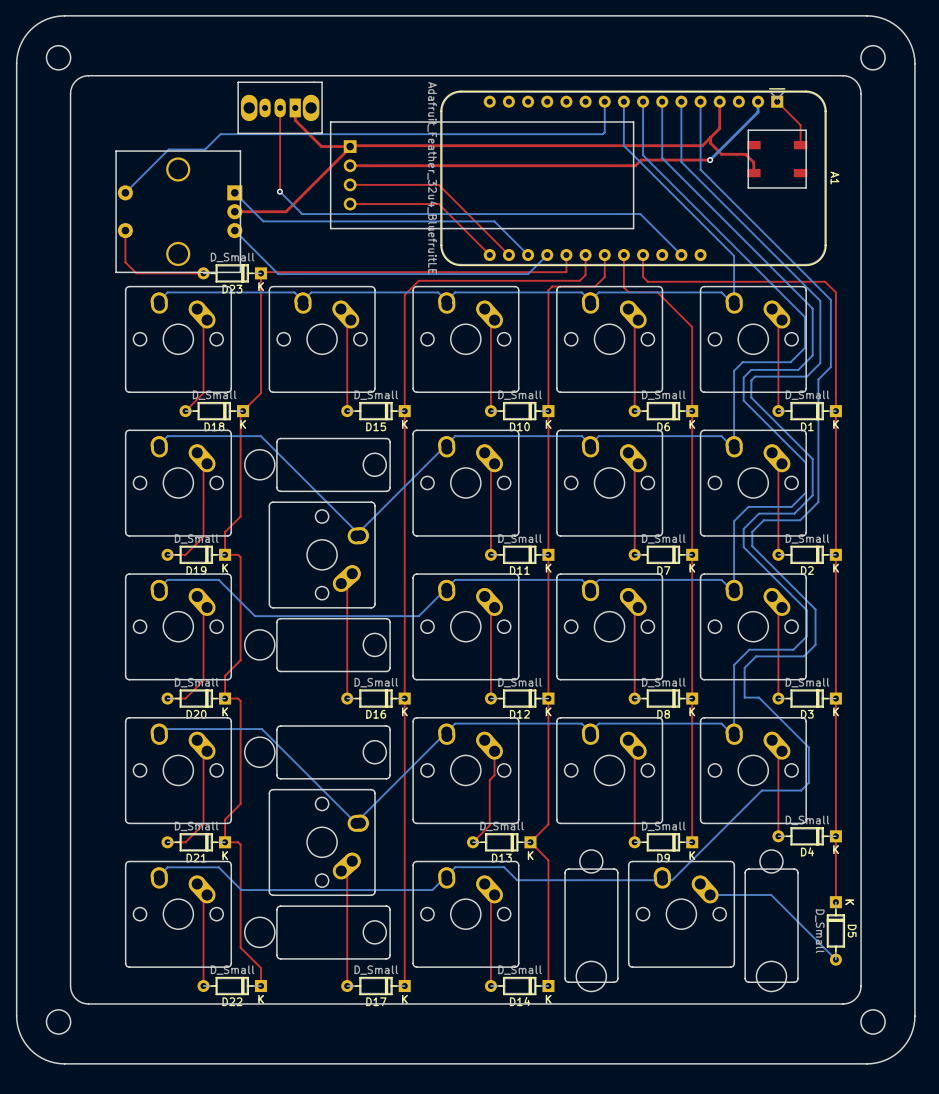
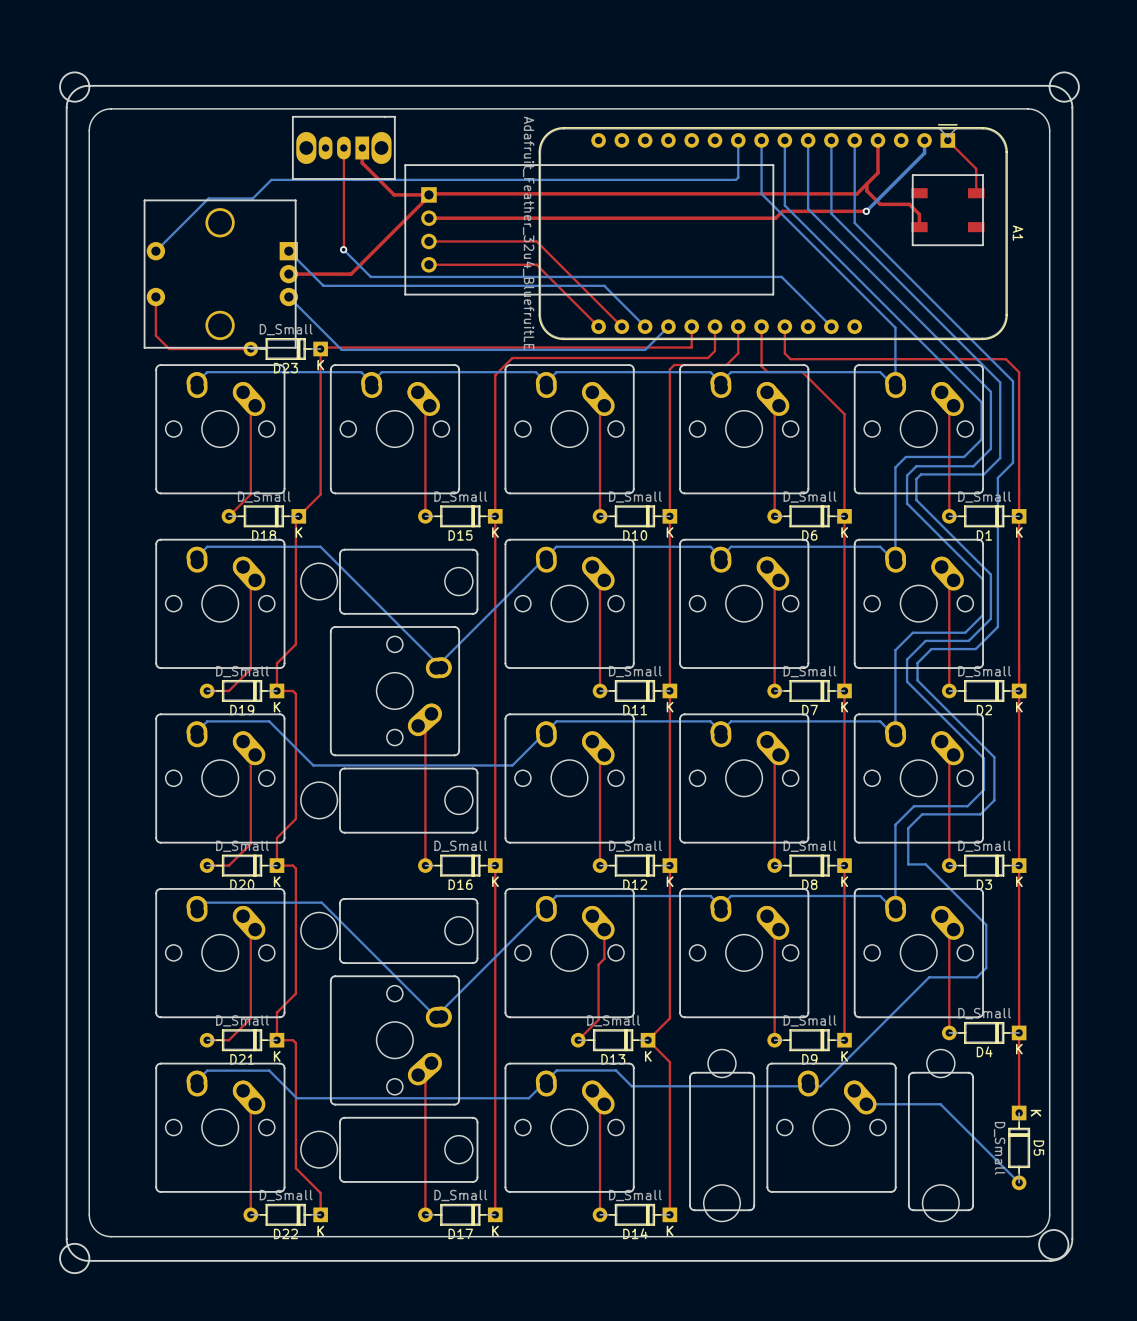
board edge: (867, 15) (64, 15) (41, 21) (27, 33) (20, 45) (16, 63) (16, 1015) (20, 1034) (34, 1052) (50, 1061) (64, 1063) (867, 1063) (885, 1060) (904, 1046) (911, 1034) (914, 1015) (914, 63) (911, 45) (900, 29) (885, 19) (867, 15) -> (1050, 85) (1058, 87) (1066, 92) (1070, 99) (1072, 107) (1072, 1239) (1067, 1252) (1058, 1259) (1050, 1260) (88, 1260) (75, 1256) (69, 1249) (66, 1239) (66, 107) (71, 94) (77, 88) (88, 85) (1050, 85)
round board edge position: (873, 1021) -> (1053, 1244)

